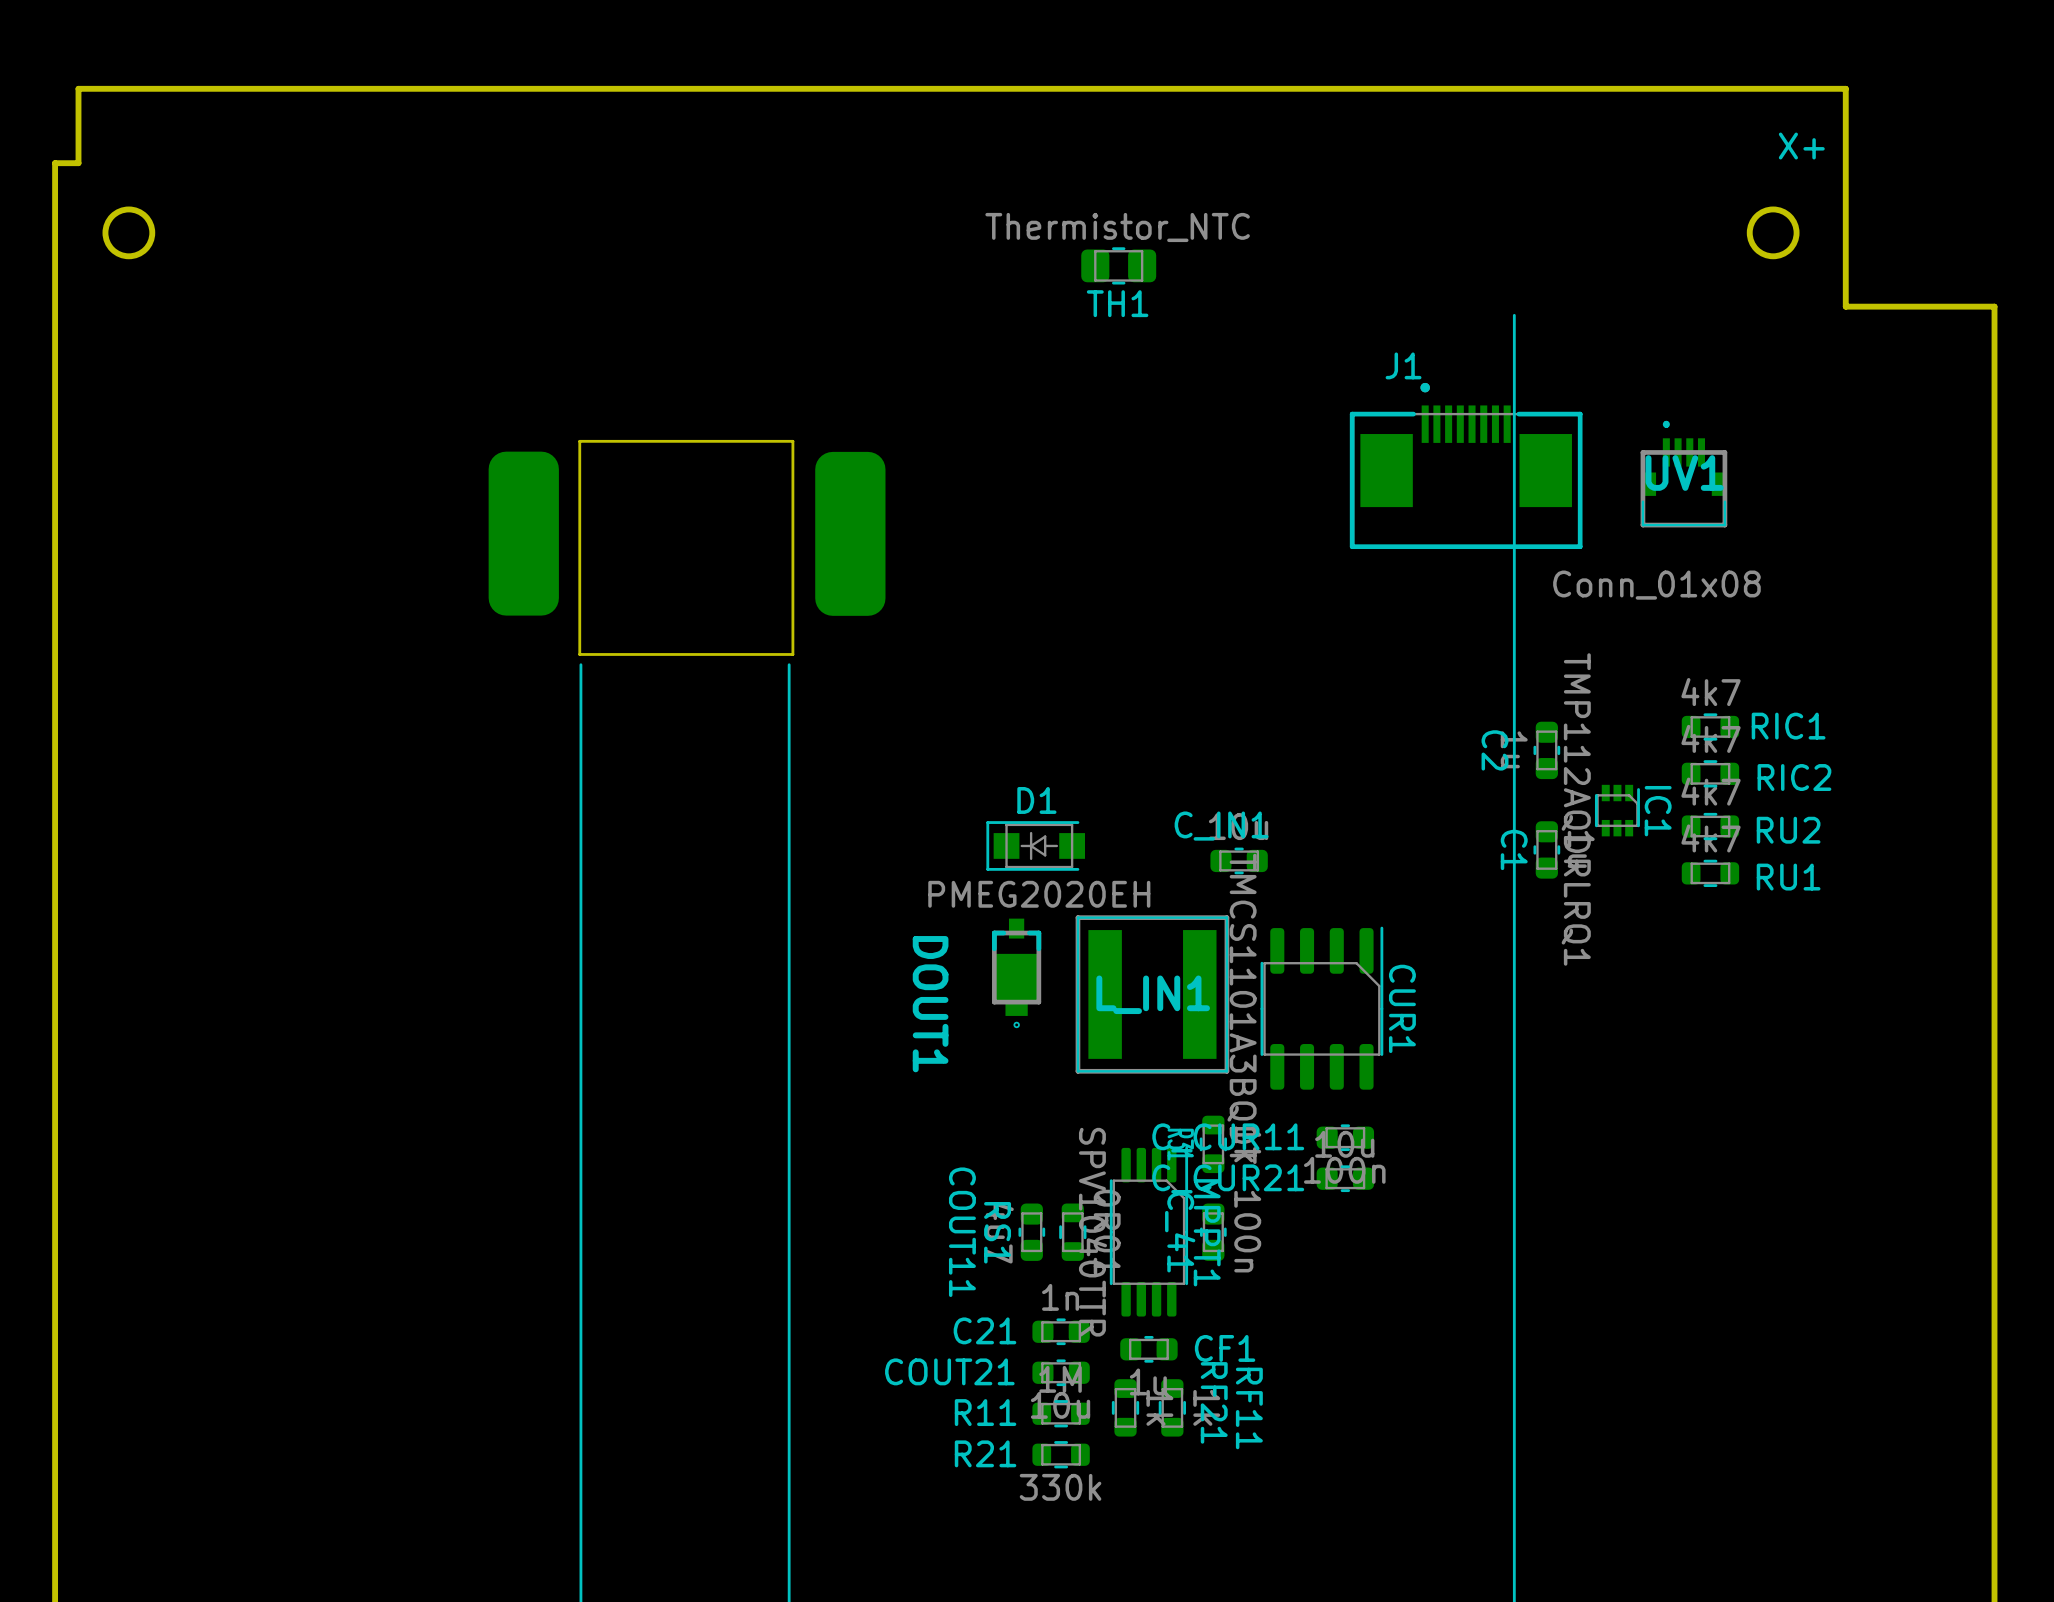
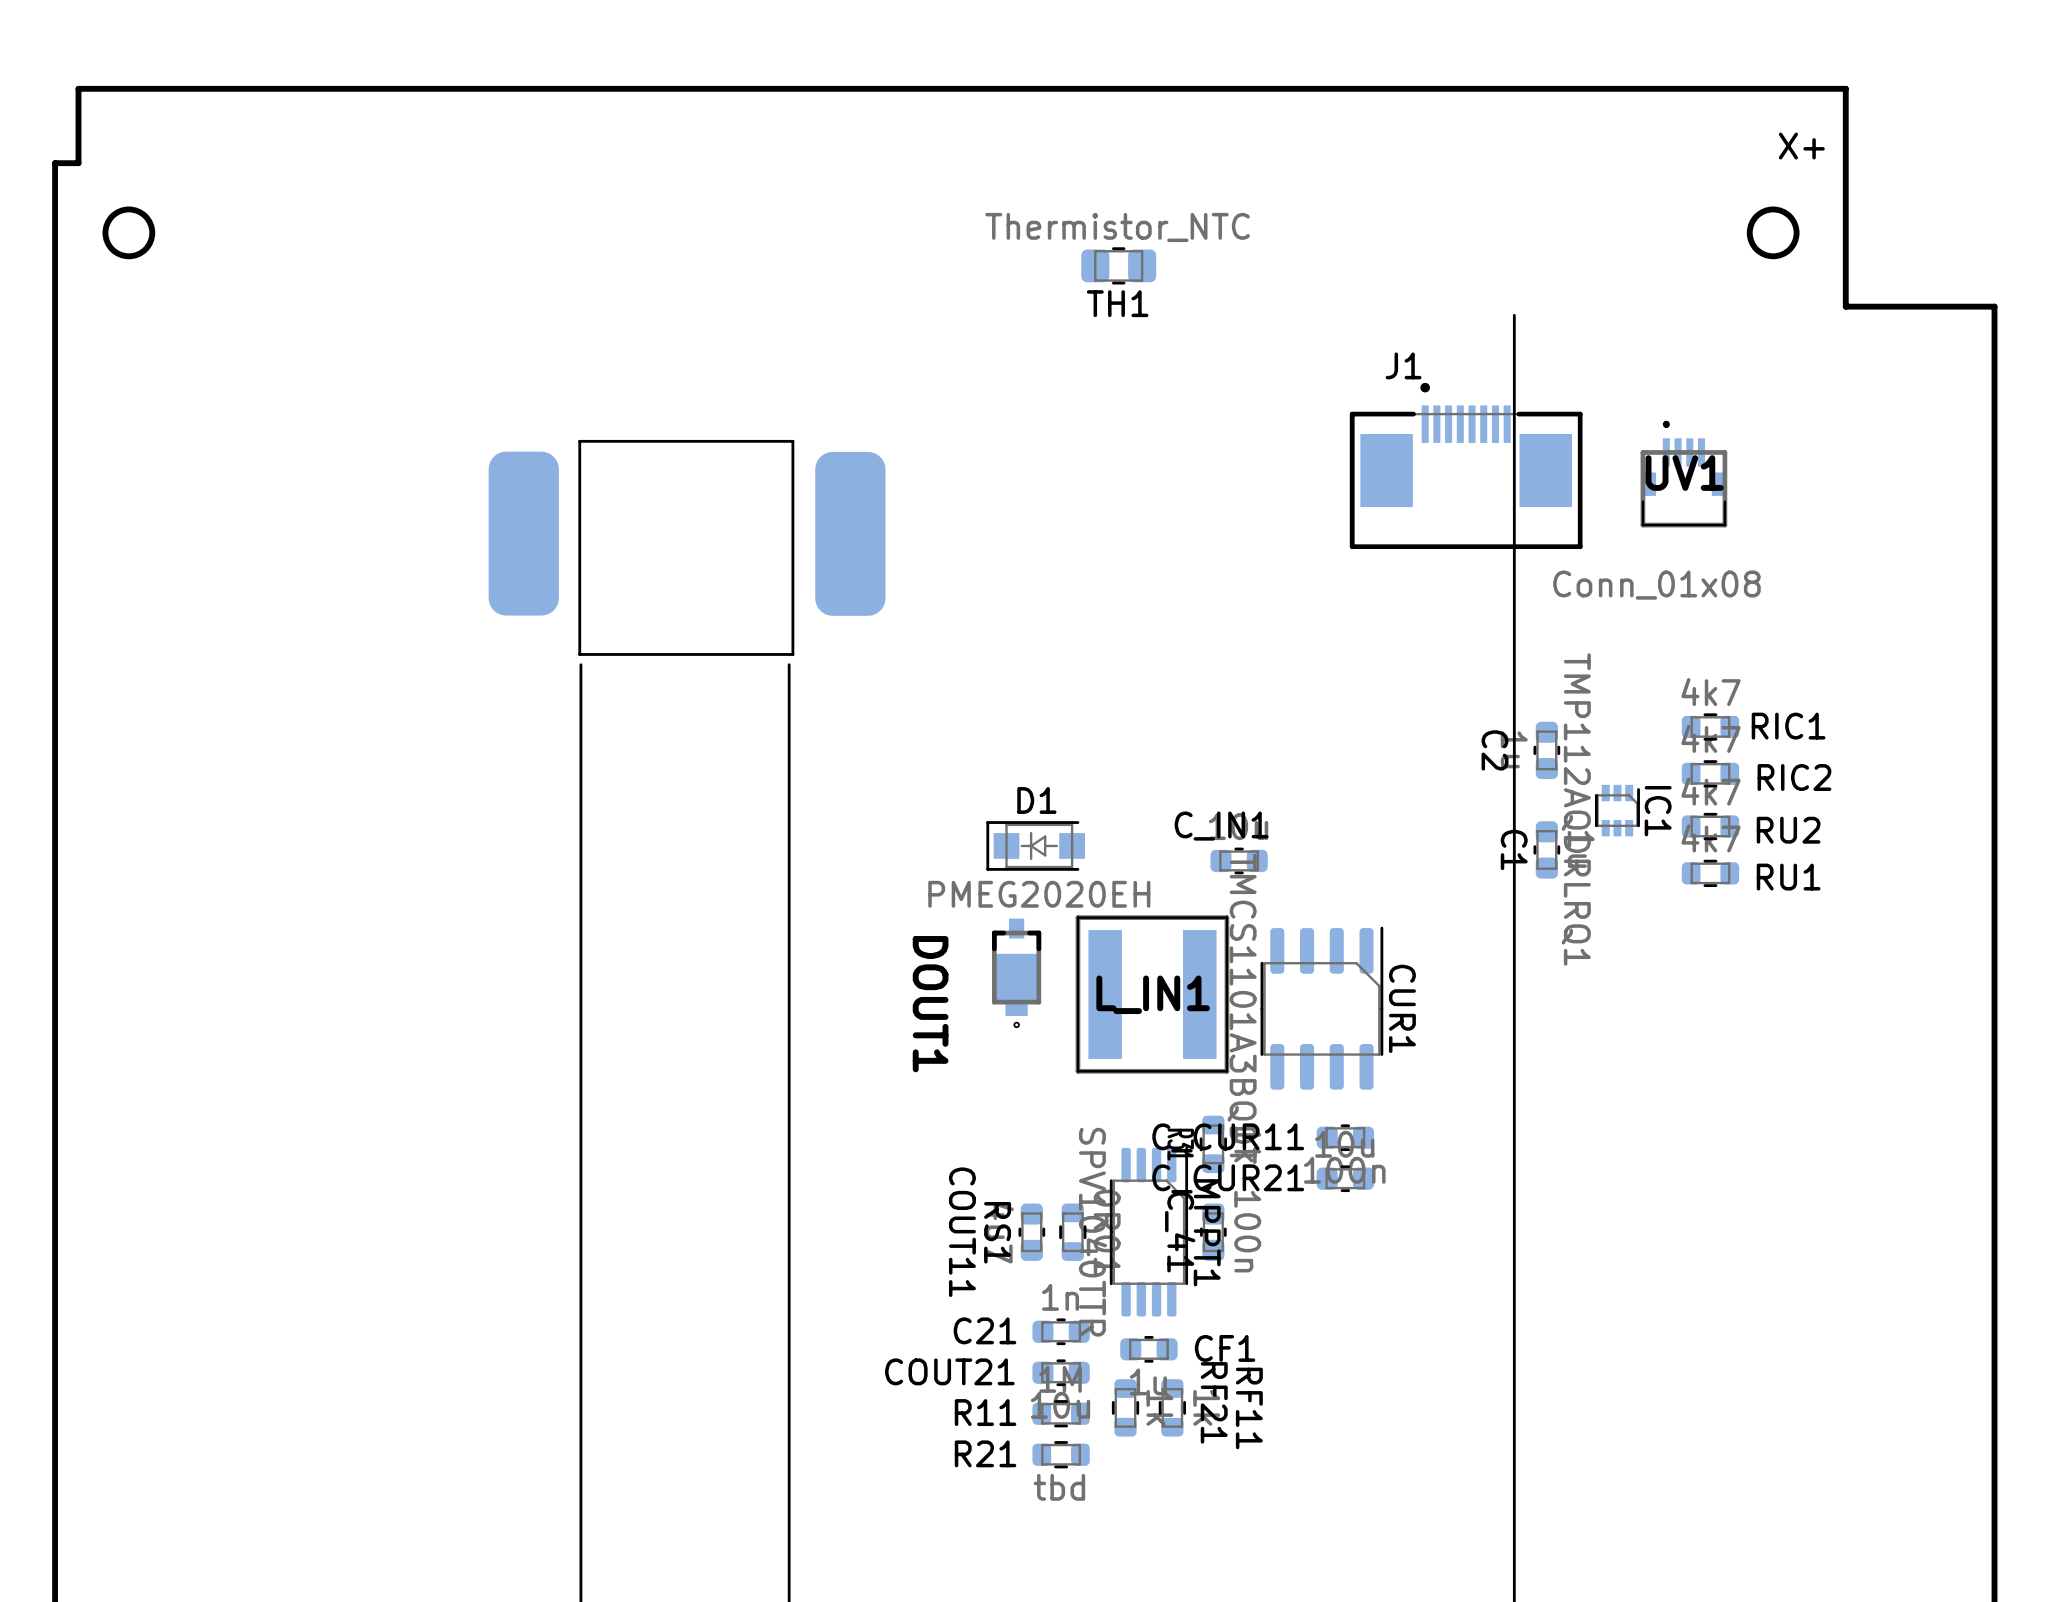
R21 value: 330k (1060, 1487) -> tbd (1059, 1487)

